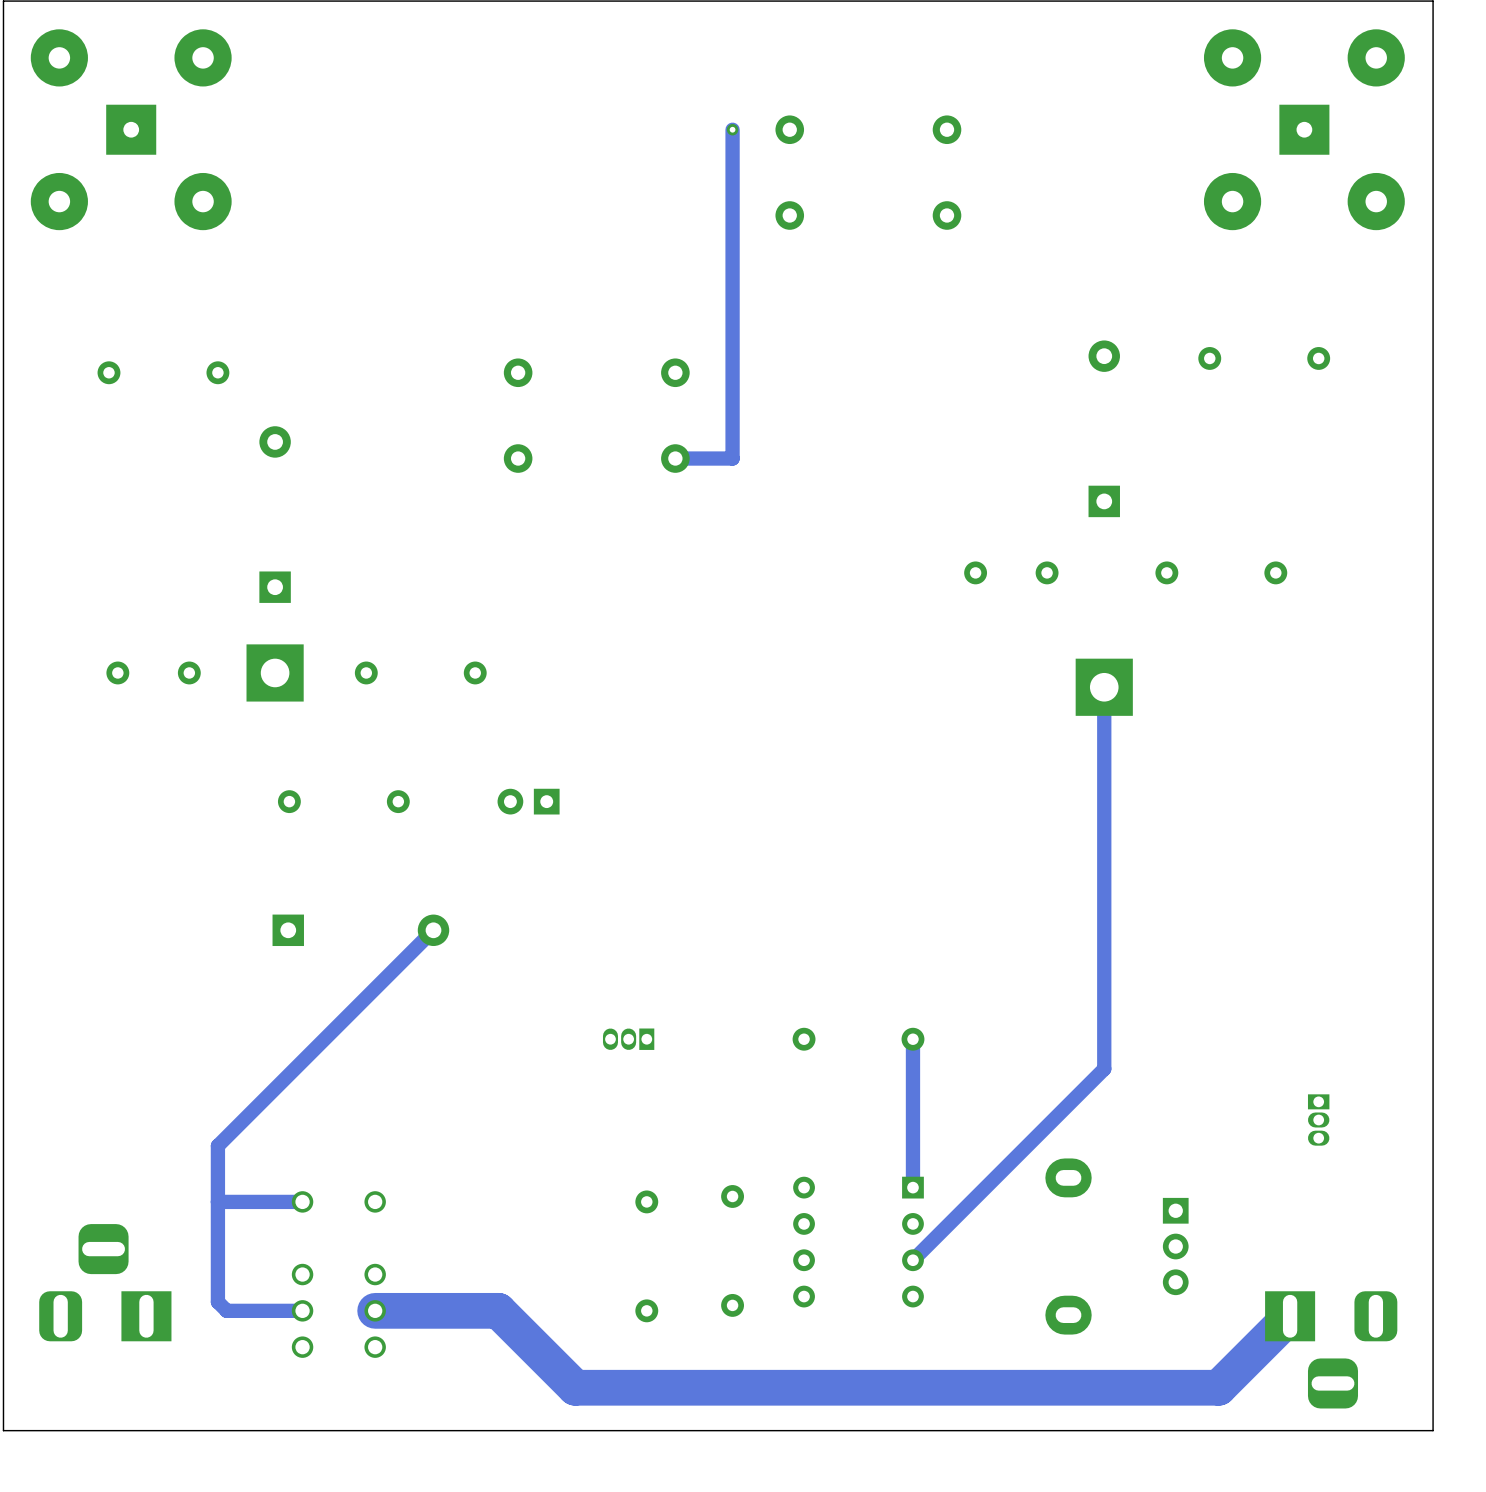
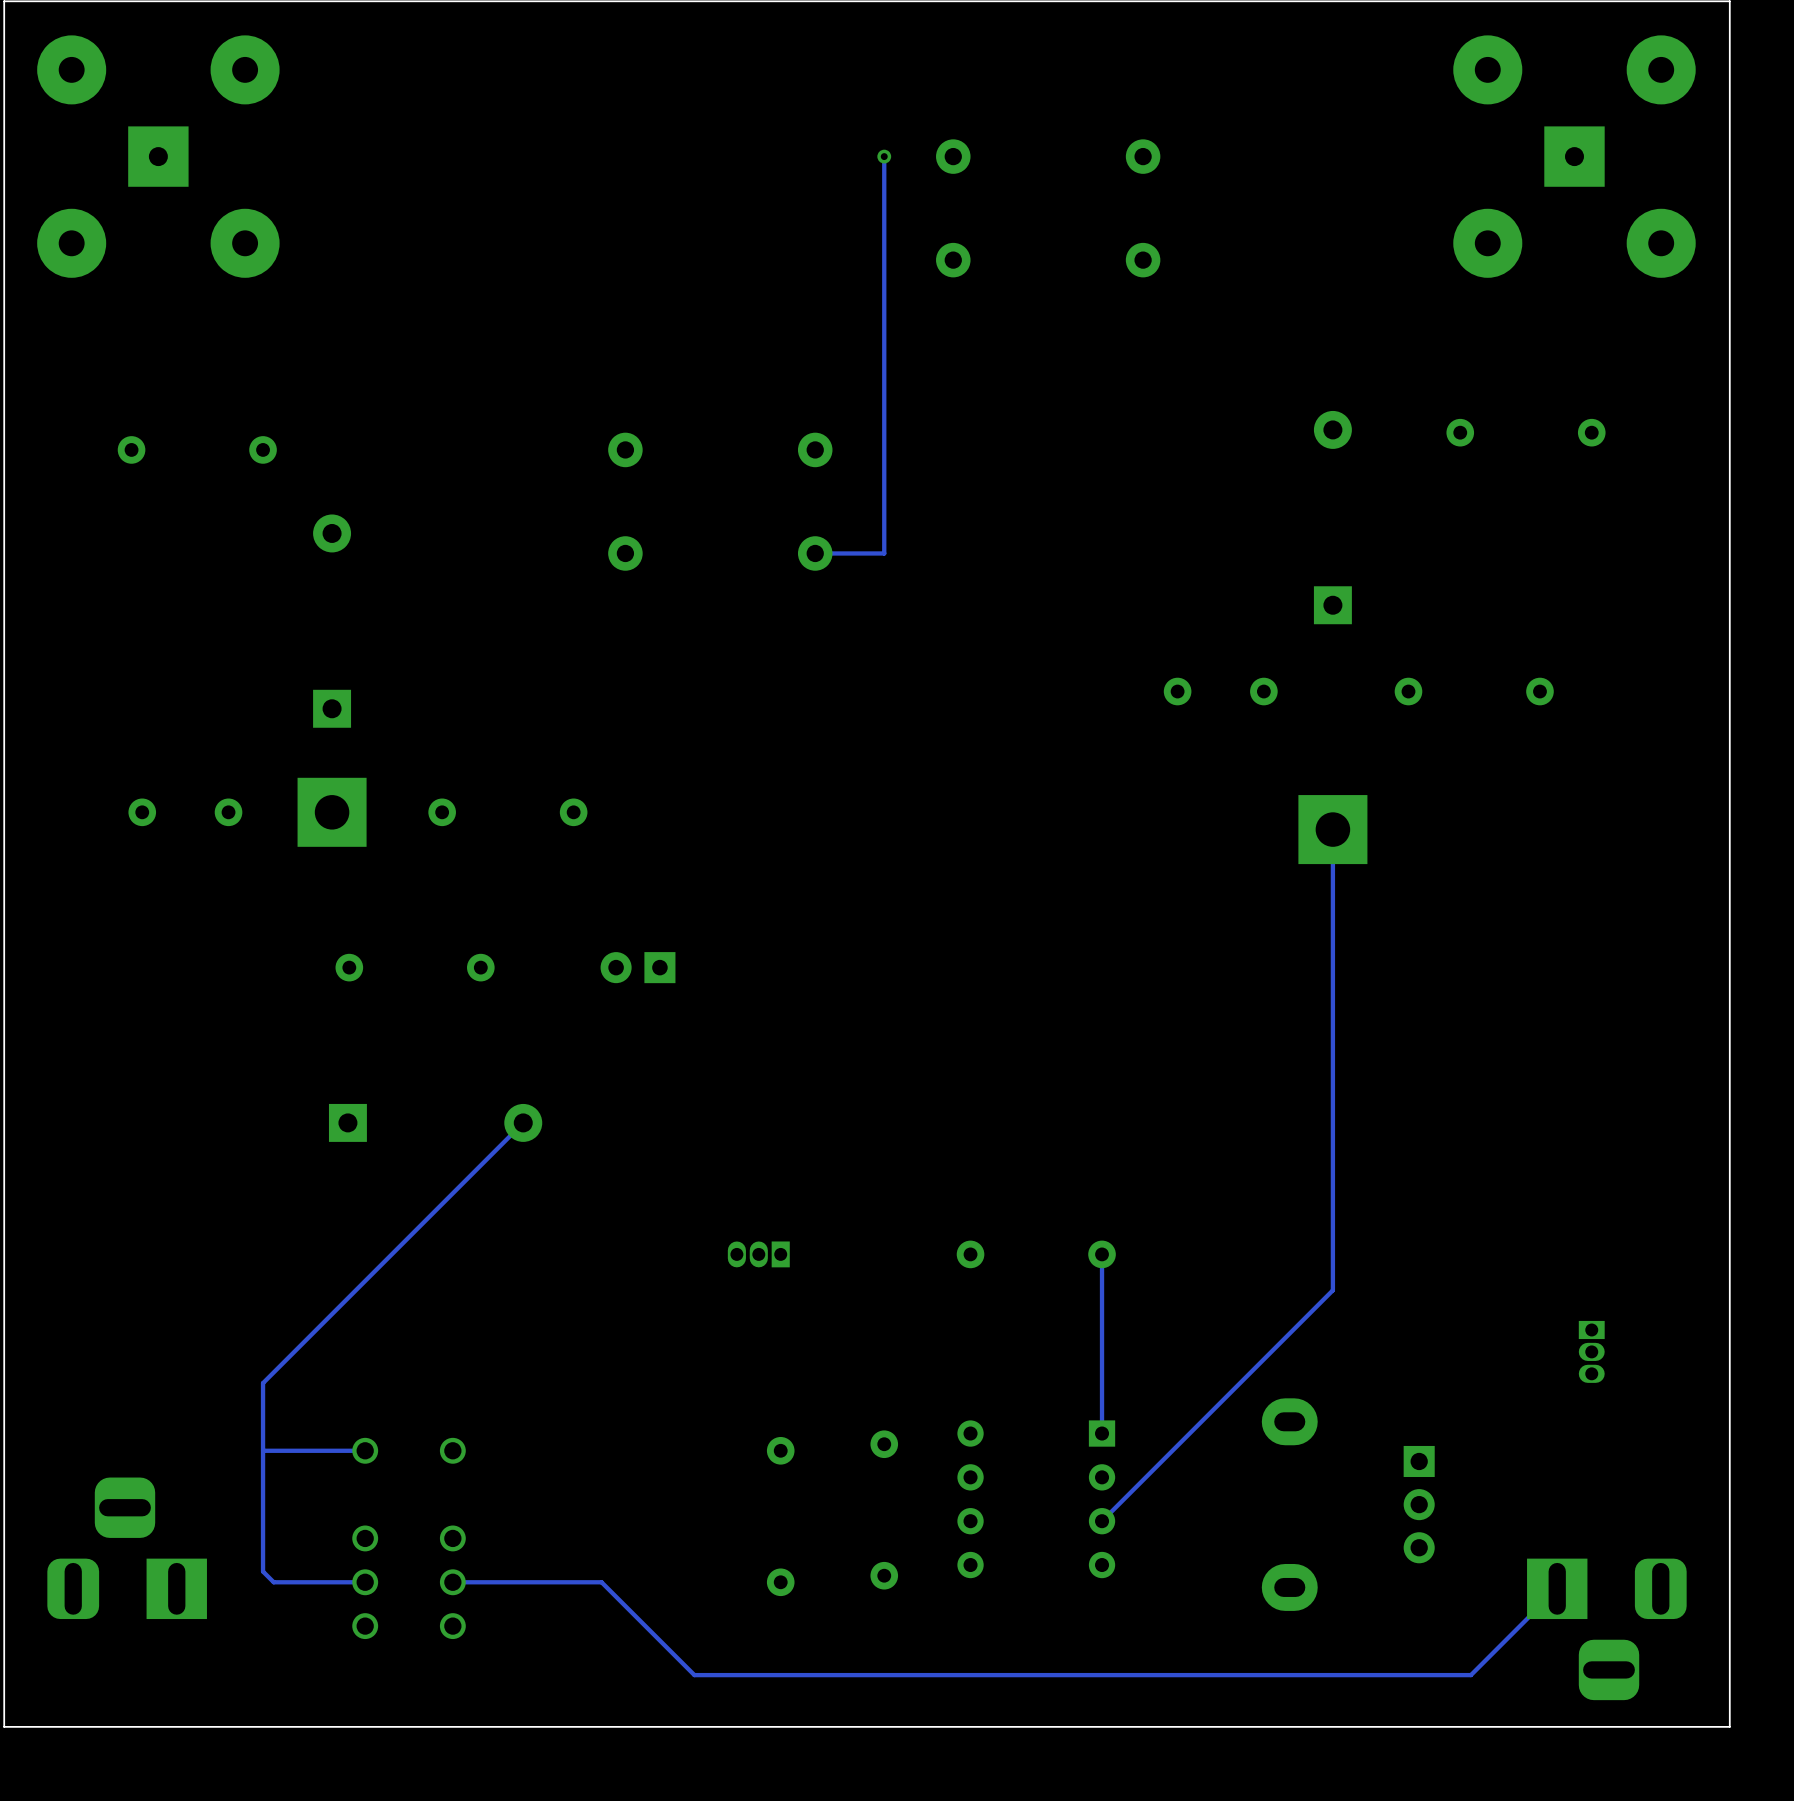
track width: thick (732, 129) (732, 458) (675, 458) -> thin (884, 156) (884, 553) (815, 553)
track width: thick (1104, 687) (1104, 1068) (912, 1260) -> thin (1332, 829) (1332, 1290) (1102, 1521)
track width: thick (433, 930) (217, 1145) (217, 1301) (226, 1310) (302, 1310) -> thin (523, 1122) (263, 1383) (263, 1571) (273, 1582) (365, 1582)
track width: thick (912, 1039) (912, 1187) -> thin (1102, 1254) (1102, 1433)
track width: thick (302, 1201) (217, 1201) -> thin (365, 1450) (263, 1450)
track width: thick (375, 1310) (498, 1310) (575, 1387) (1218, 1387) (1290, 1316) -> thin (452, 1582) (601, 1582) (694, 1675) (1470, 1675) (1557, 1588)

